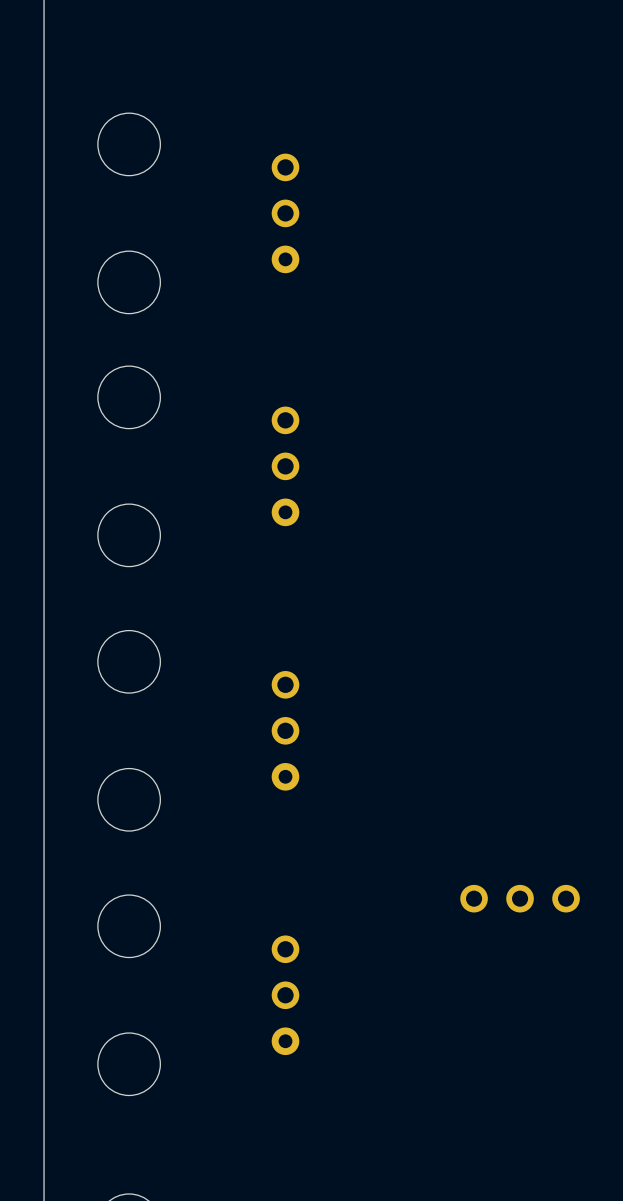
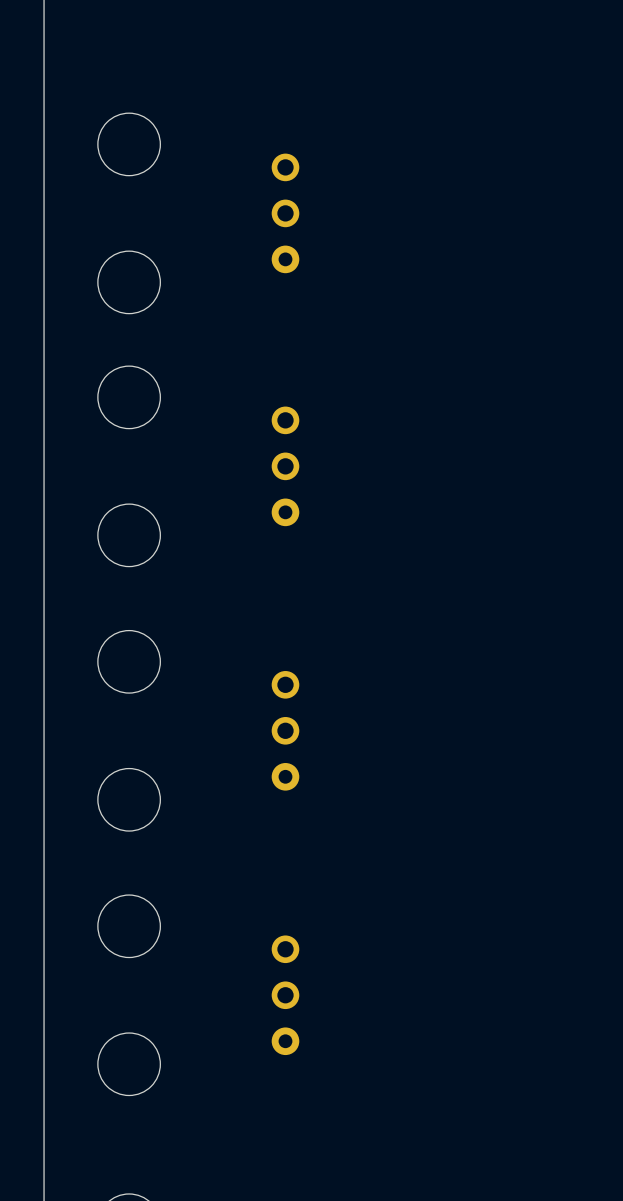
part: (520, 898) -> none

